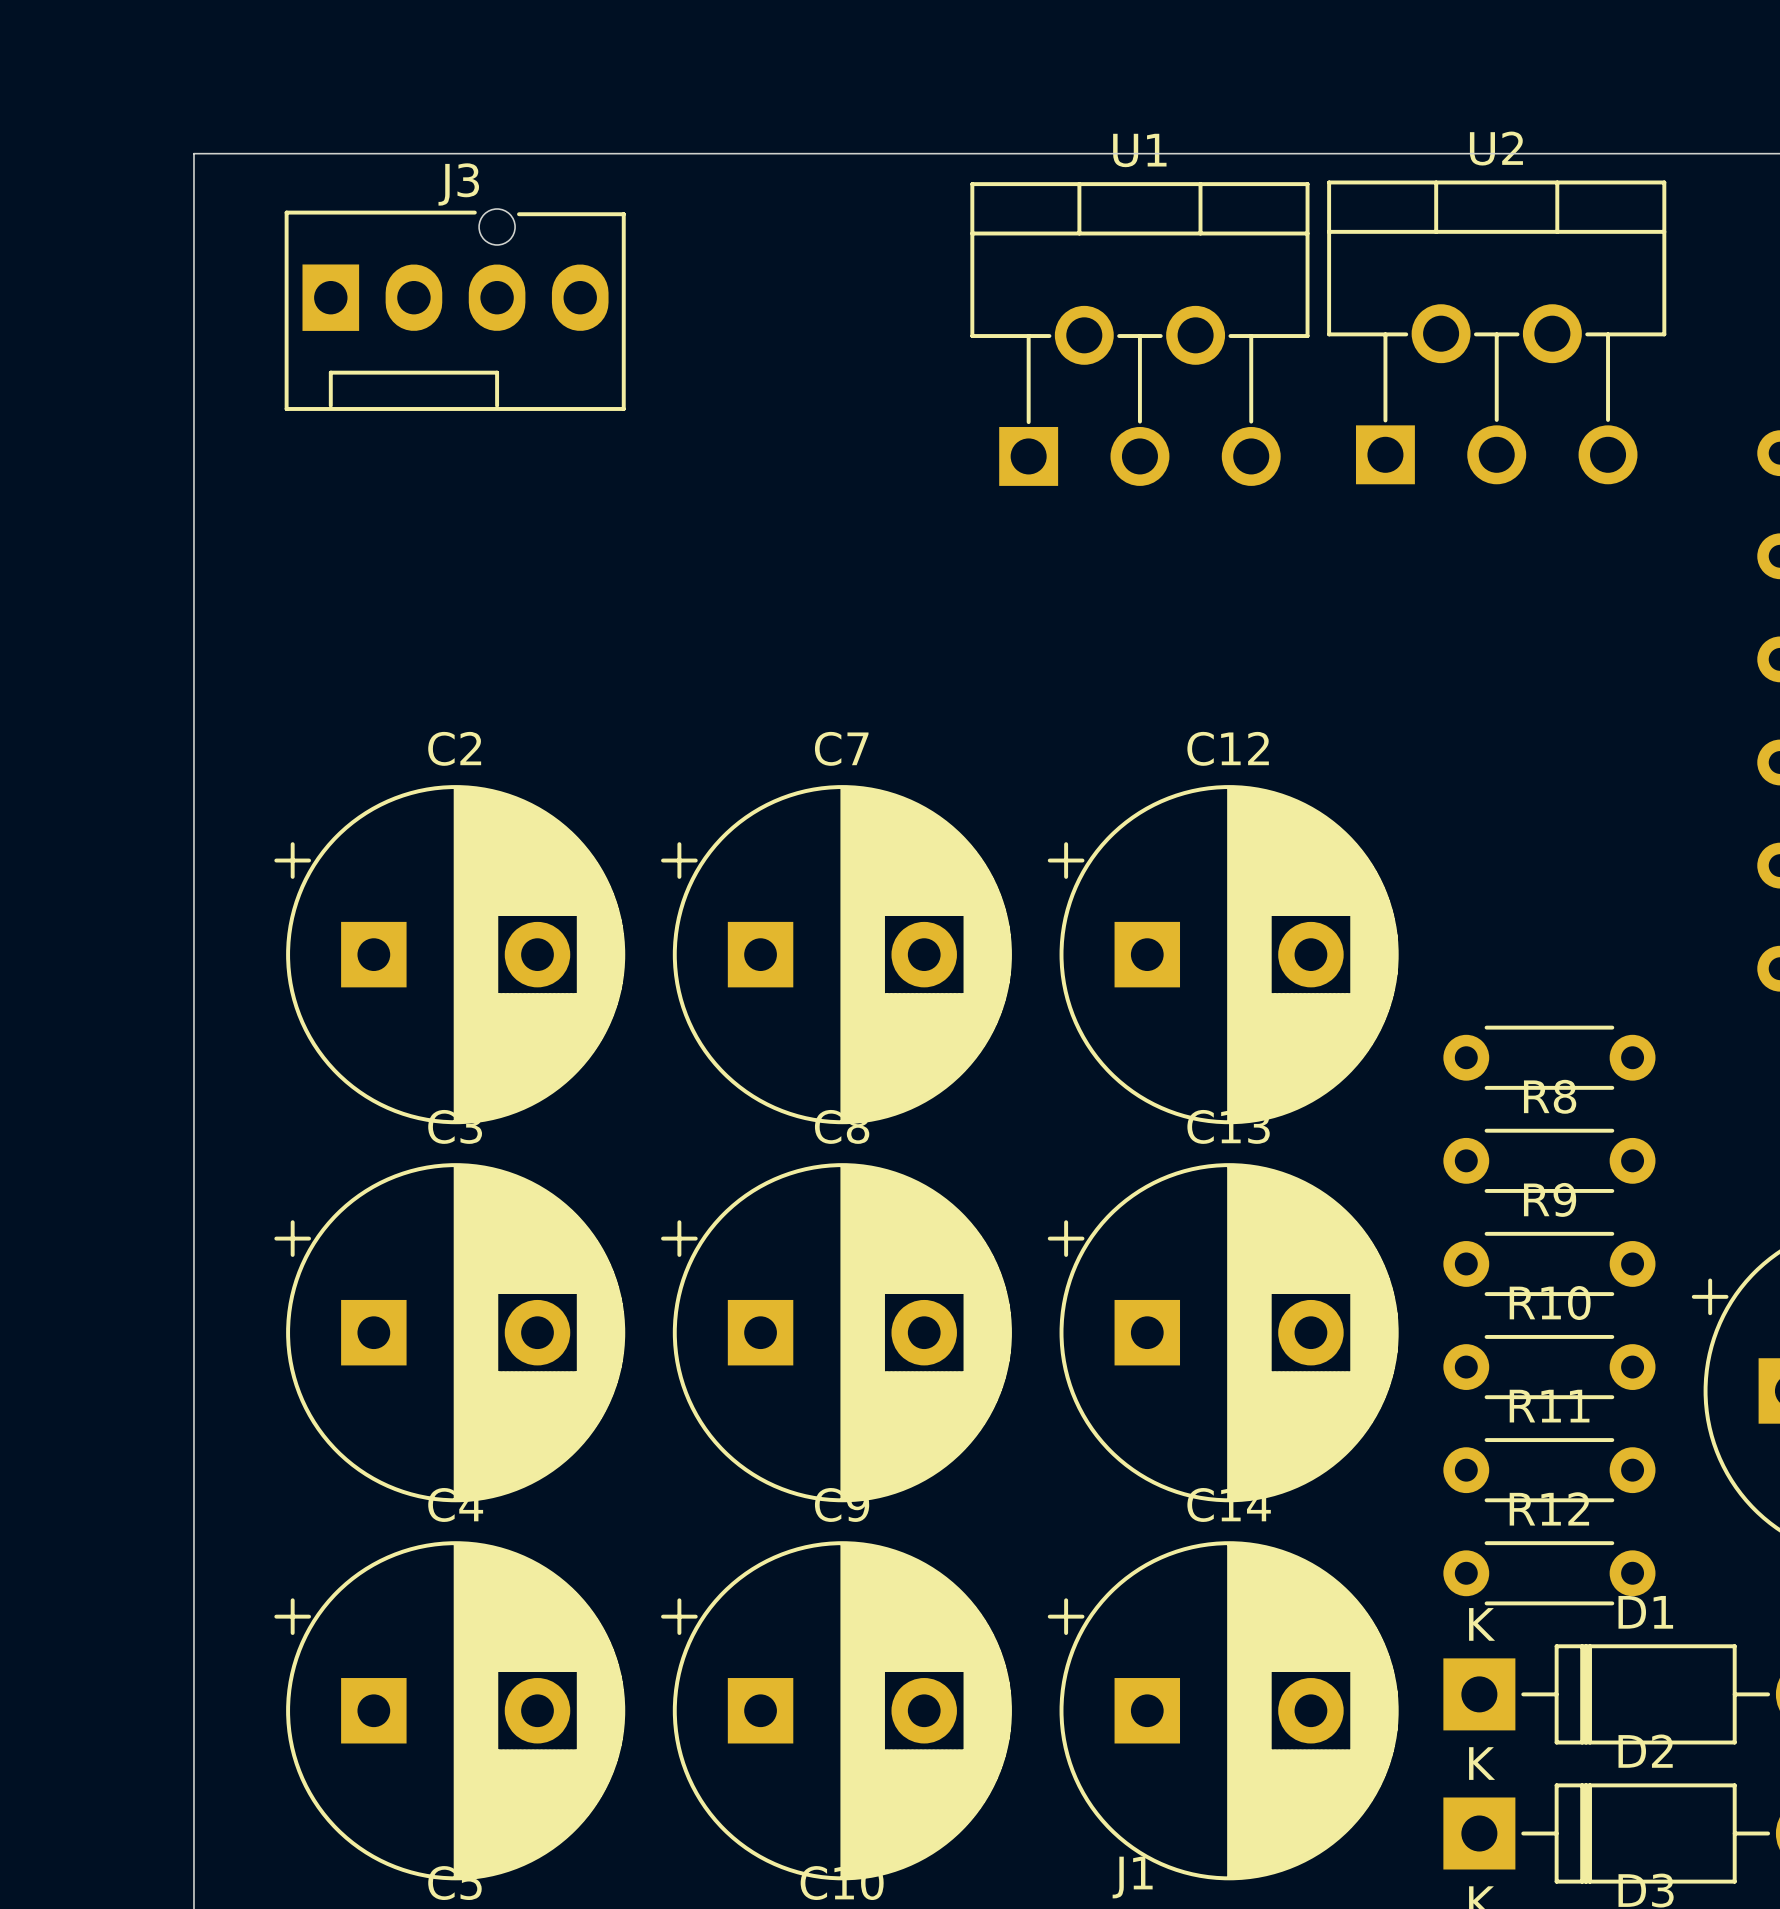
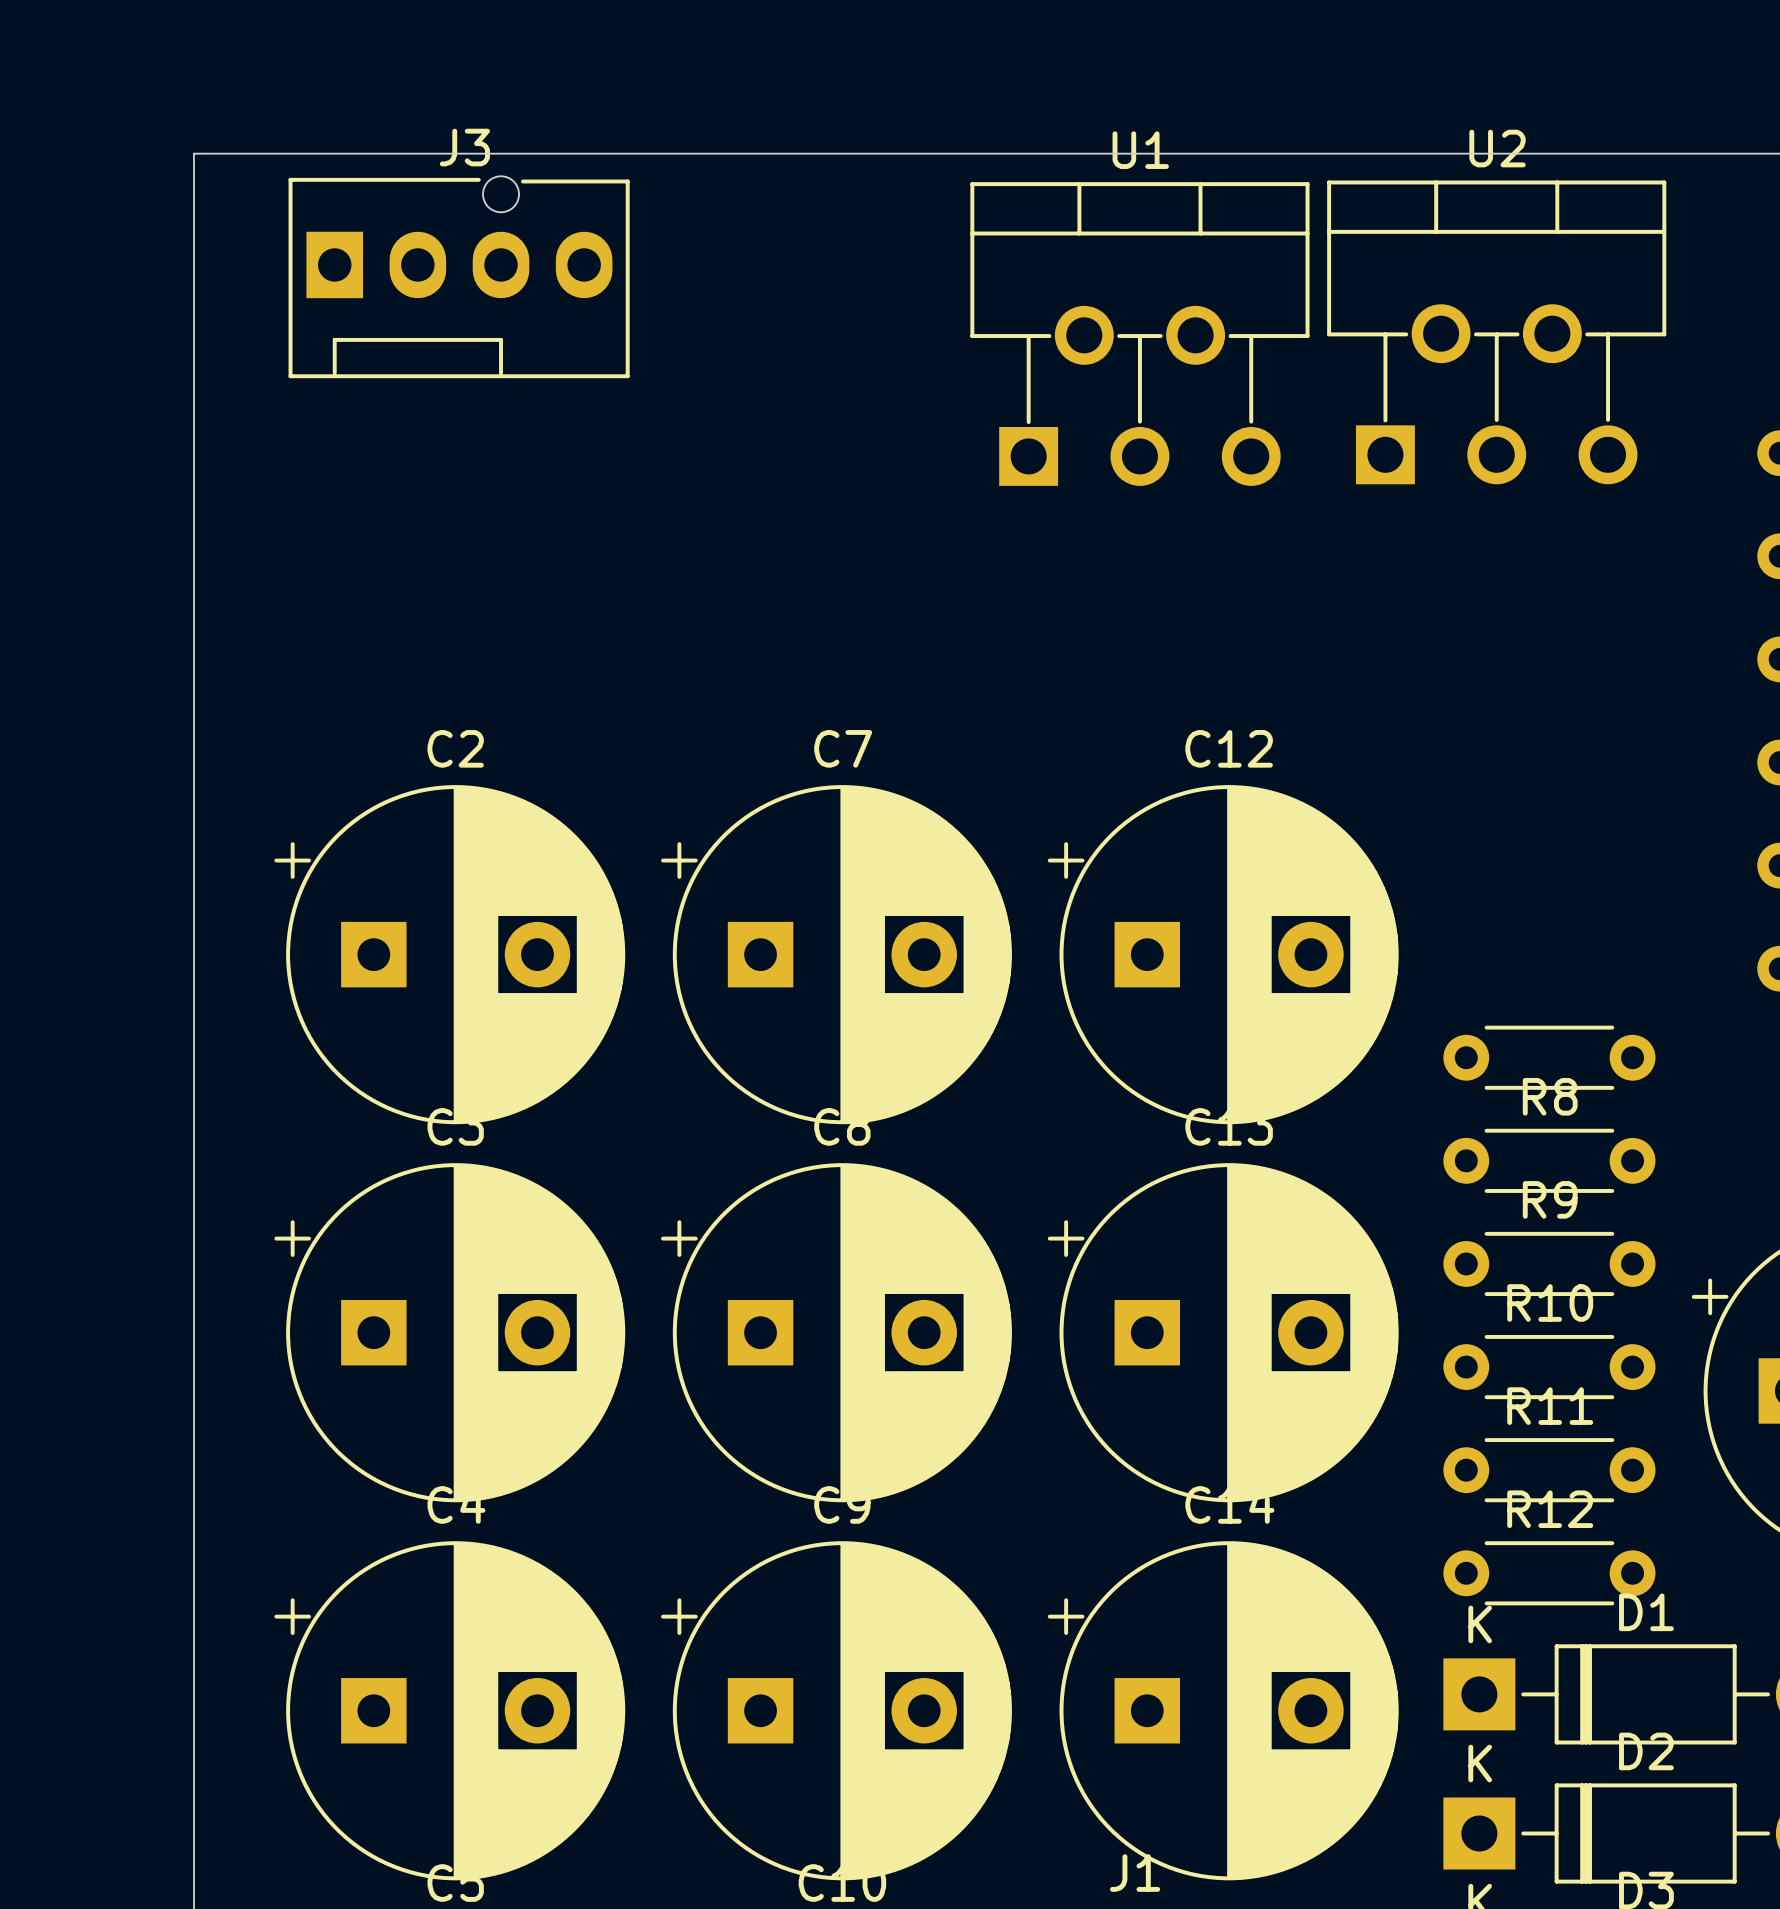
J3 position: (455, 309) -> (459, 277)

